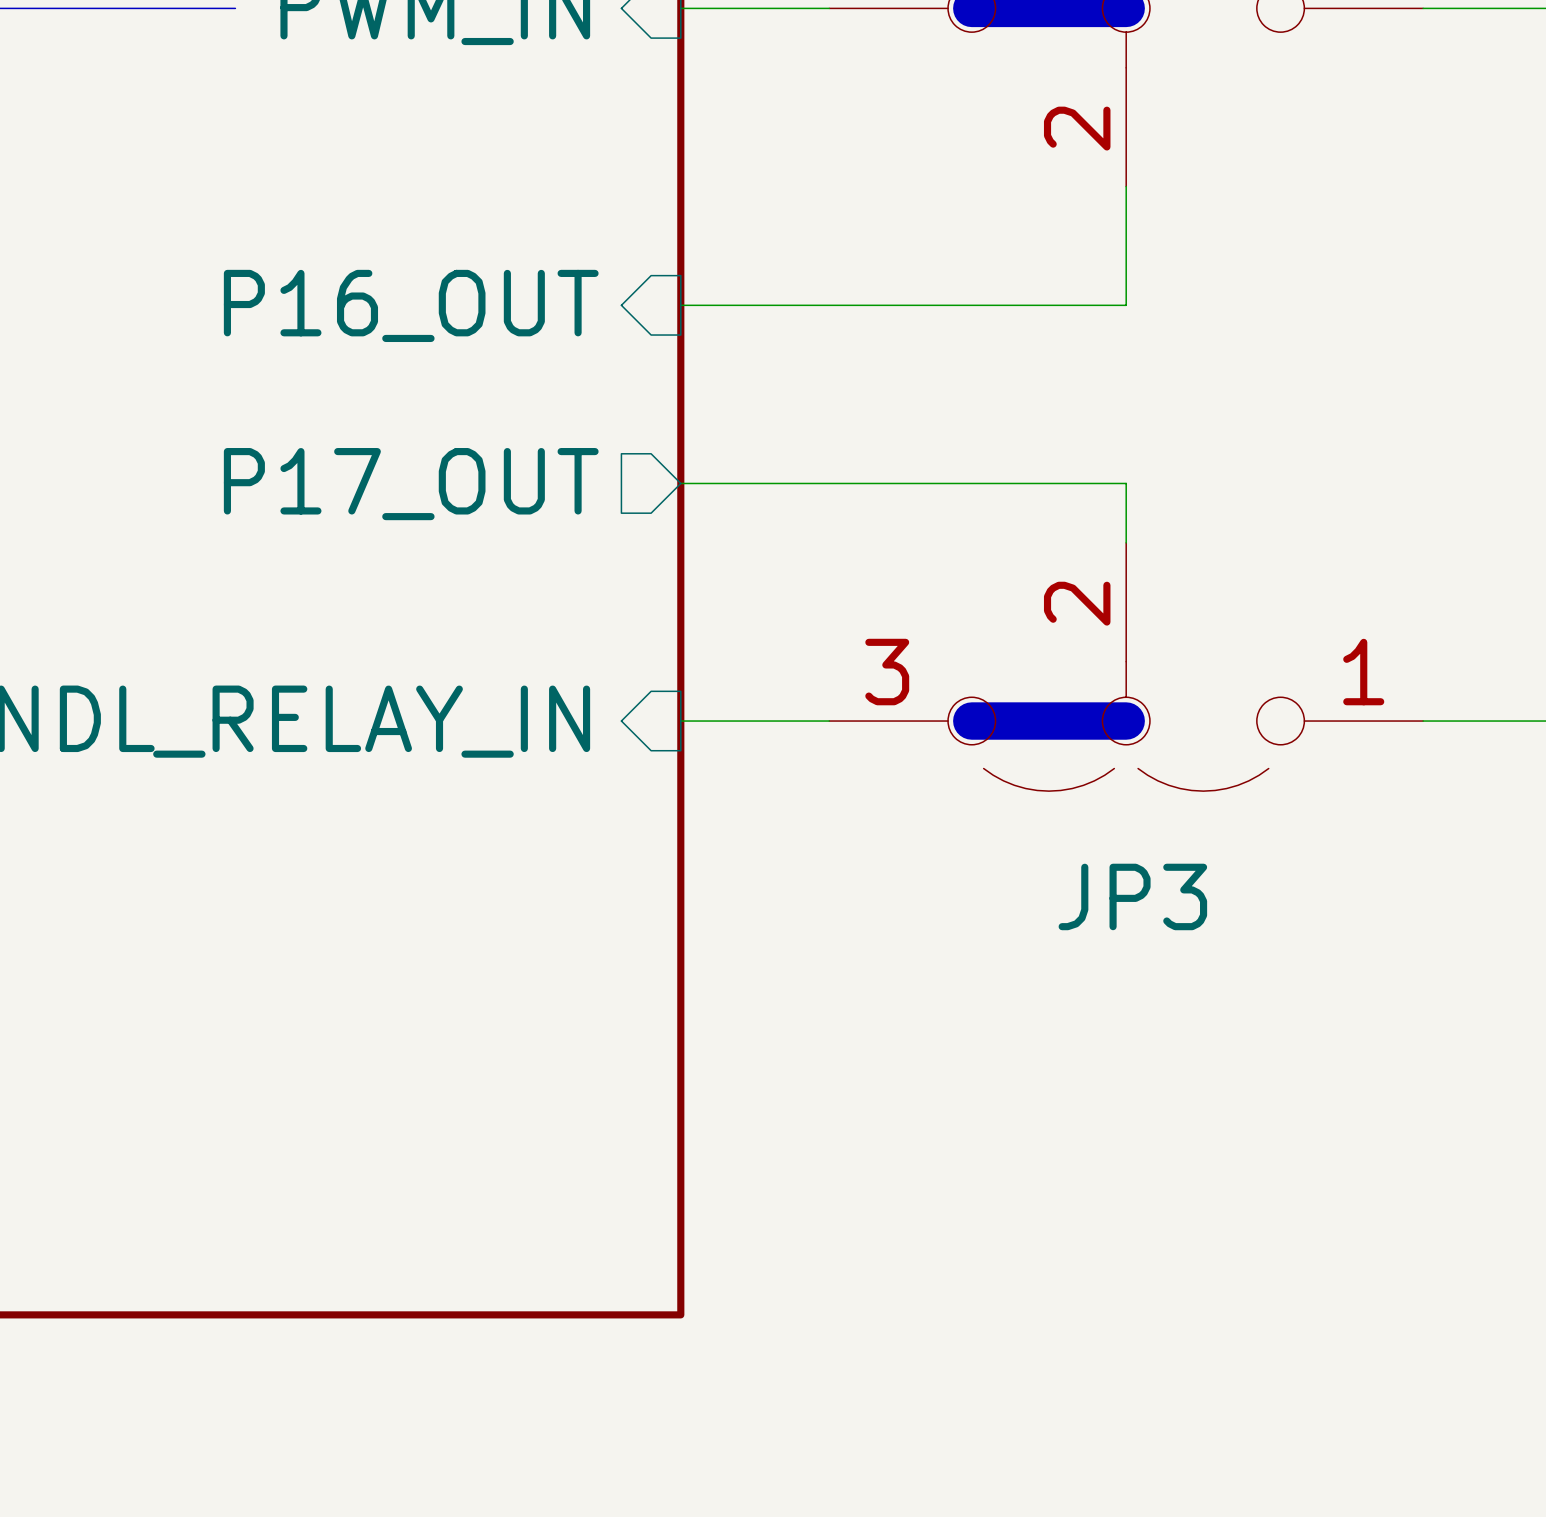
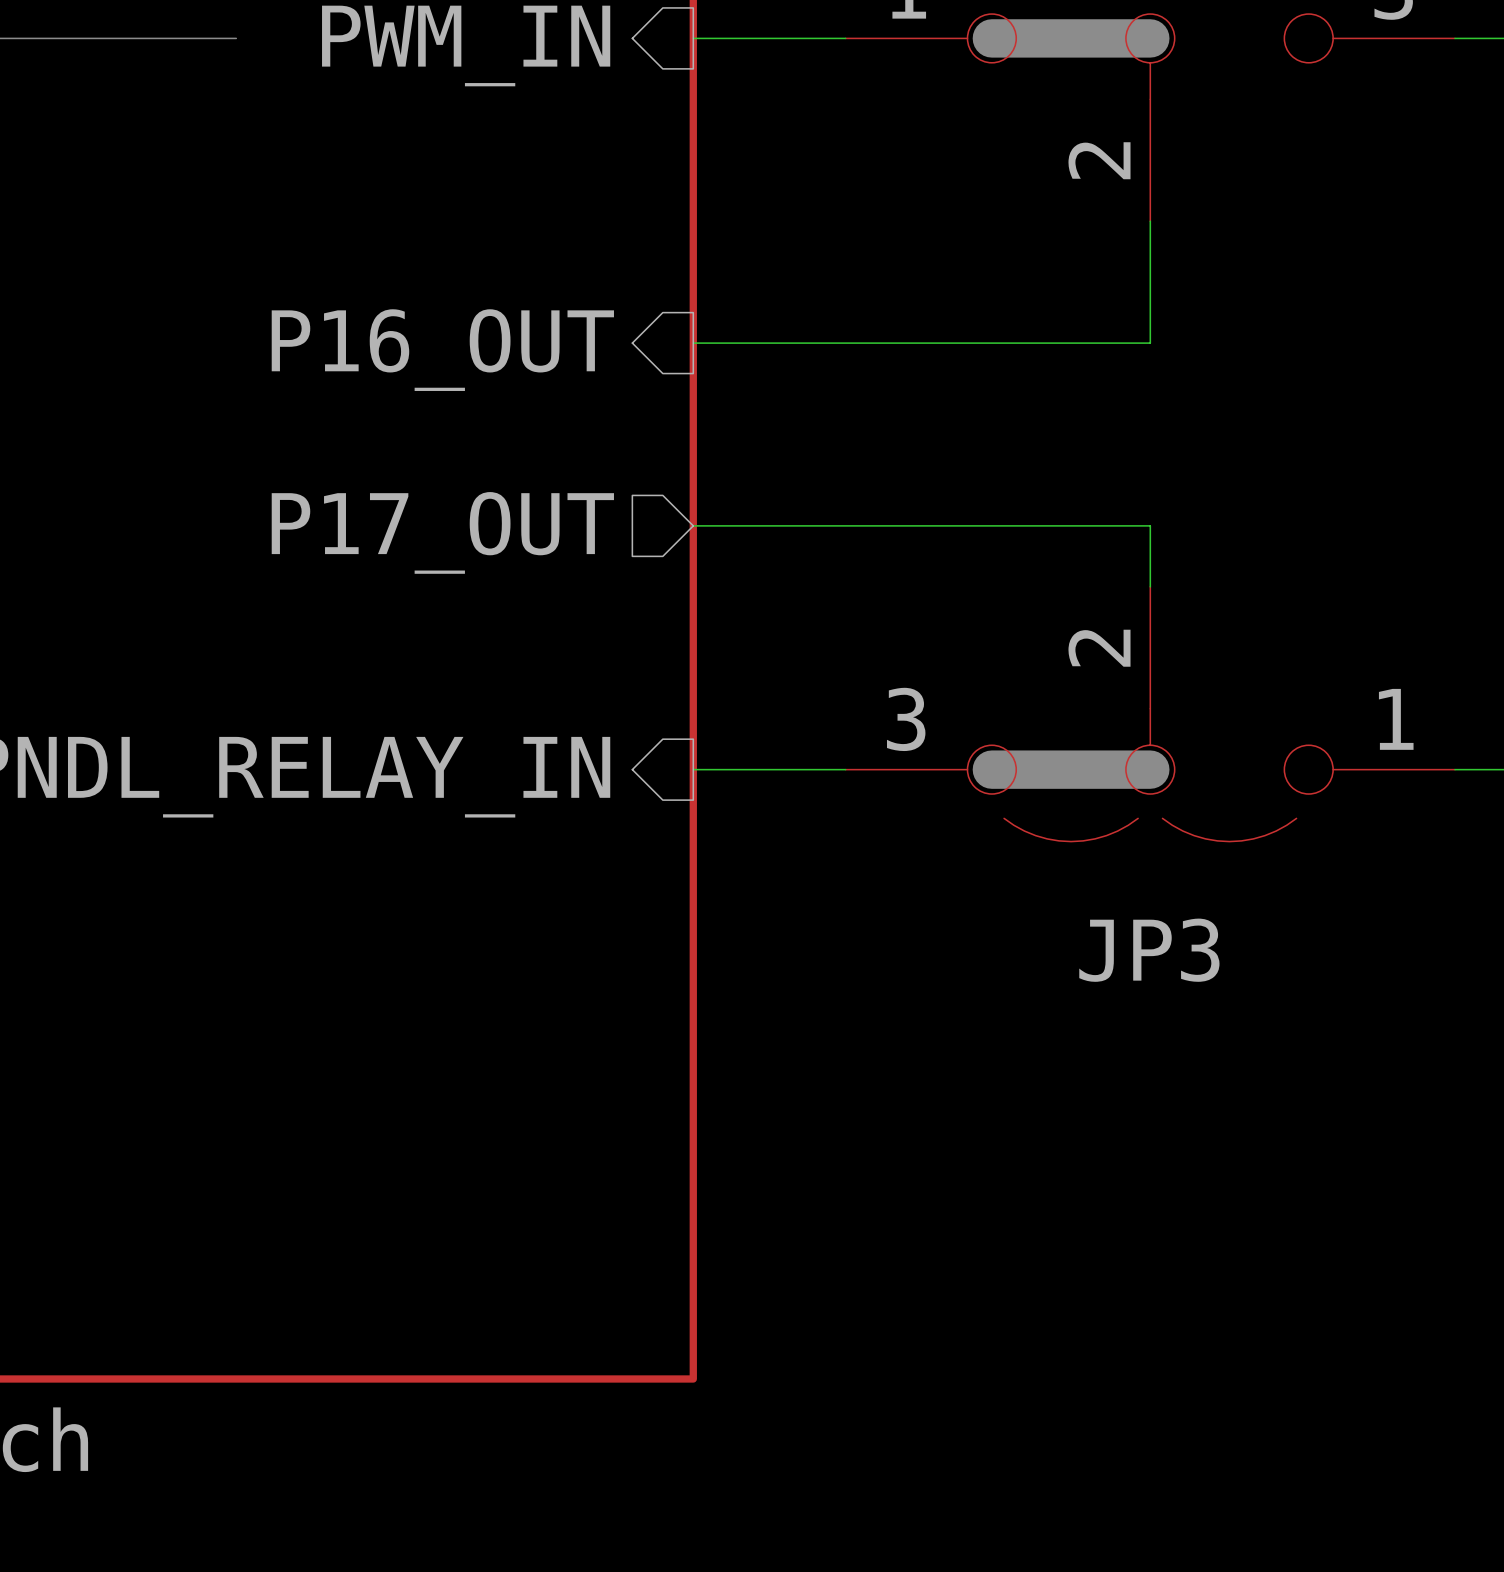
JP3 name position: JP3 (1132, 896) -> JP3 (1149, 950)

